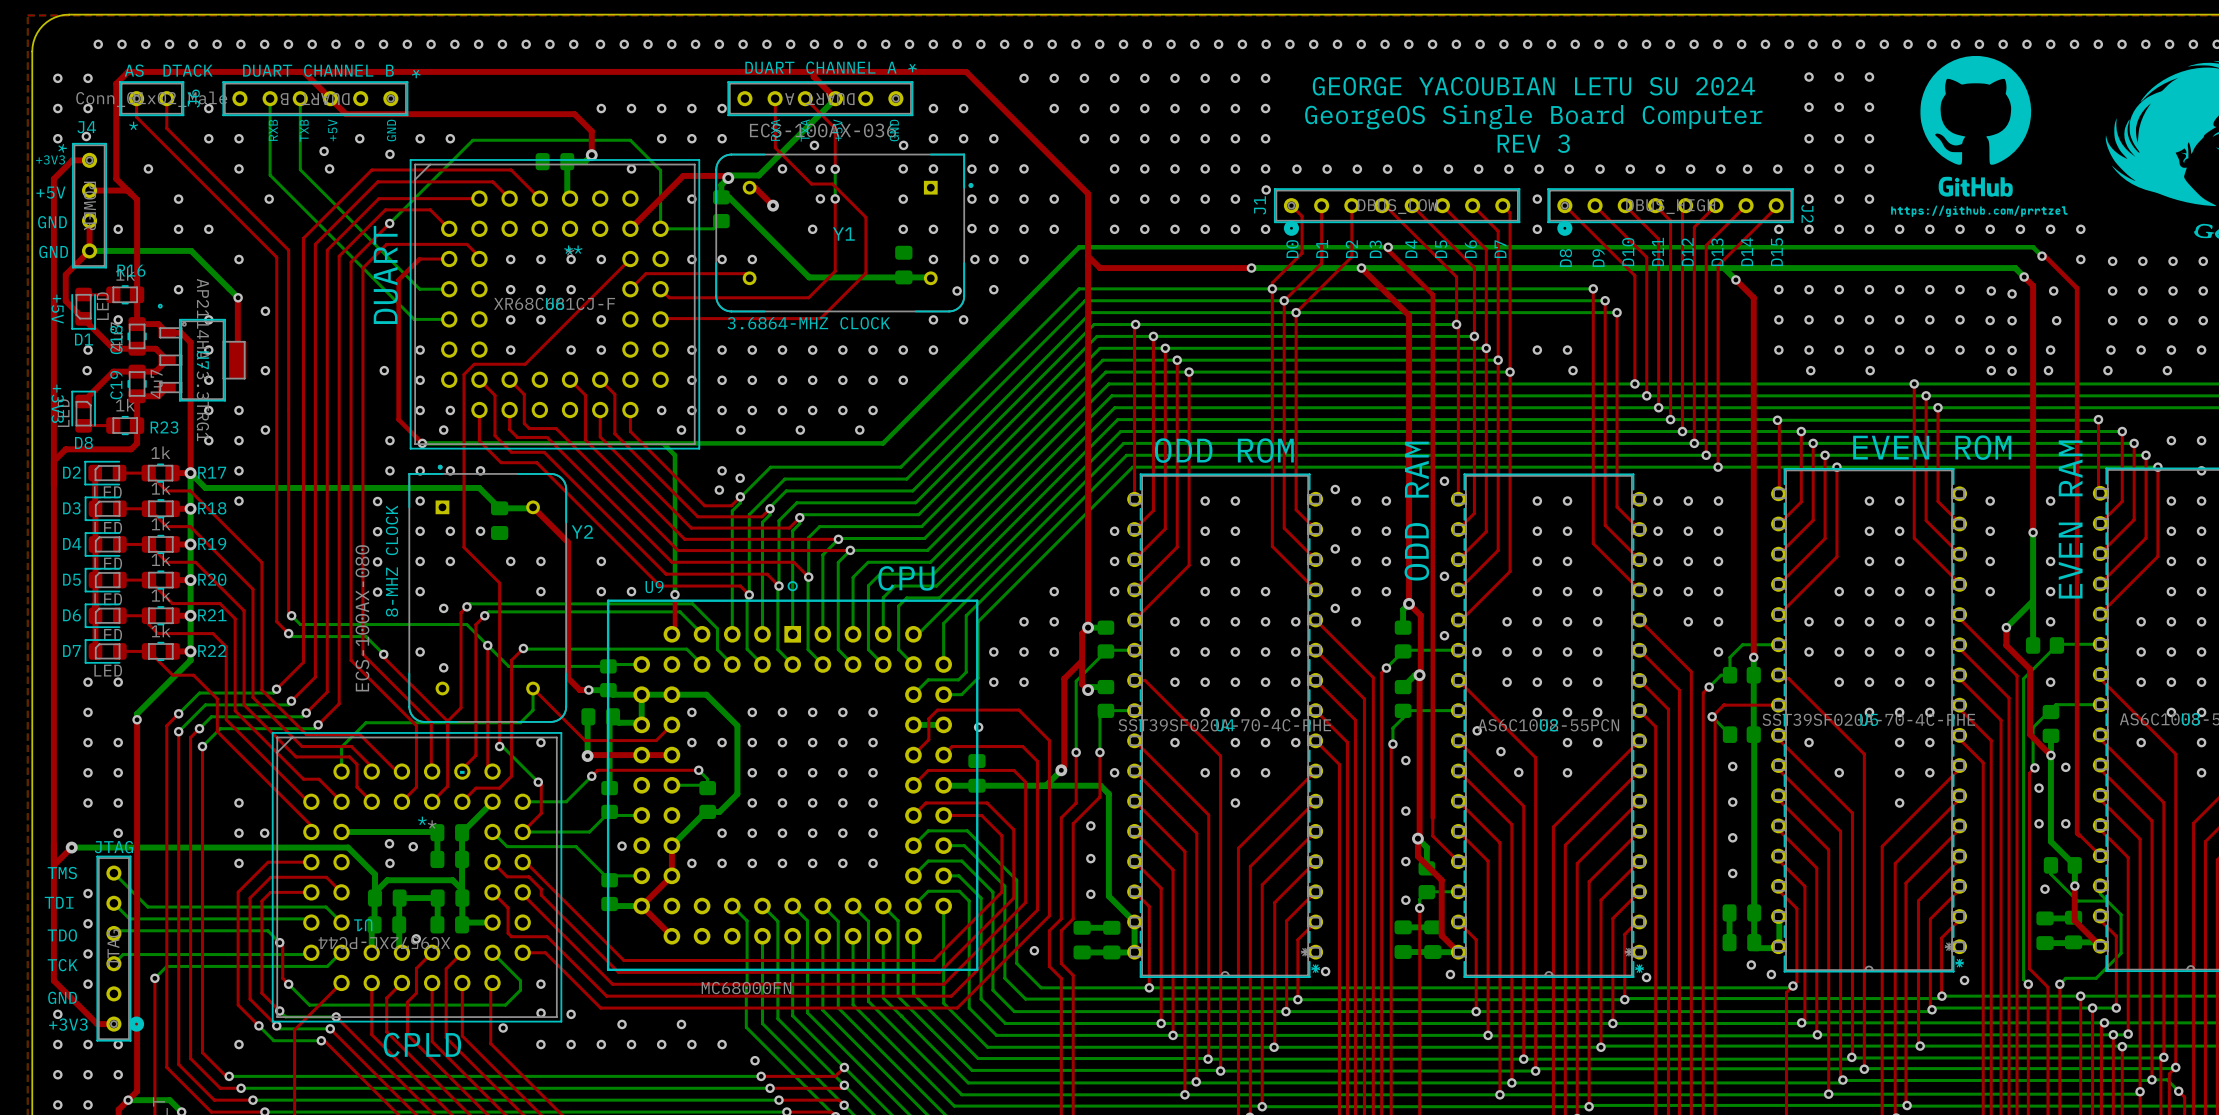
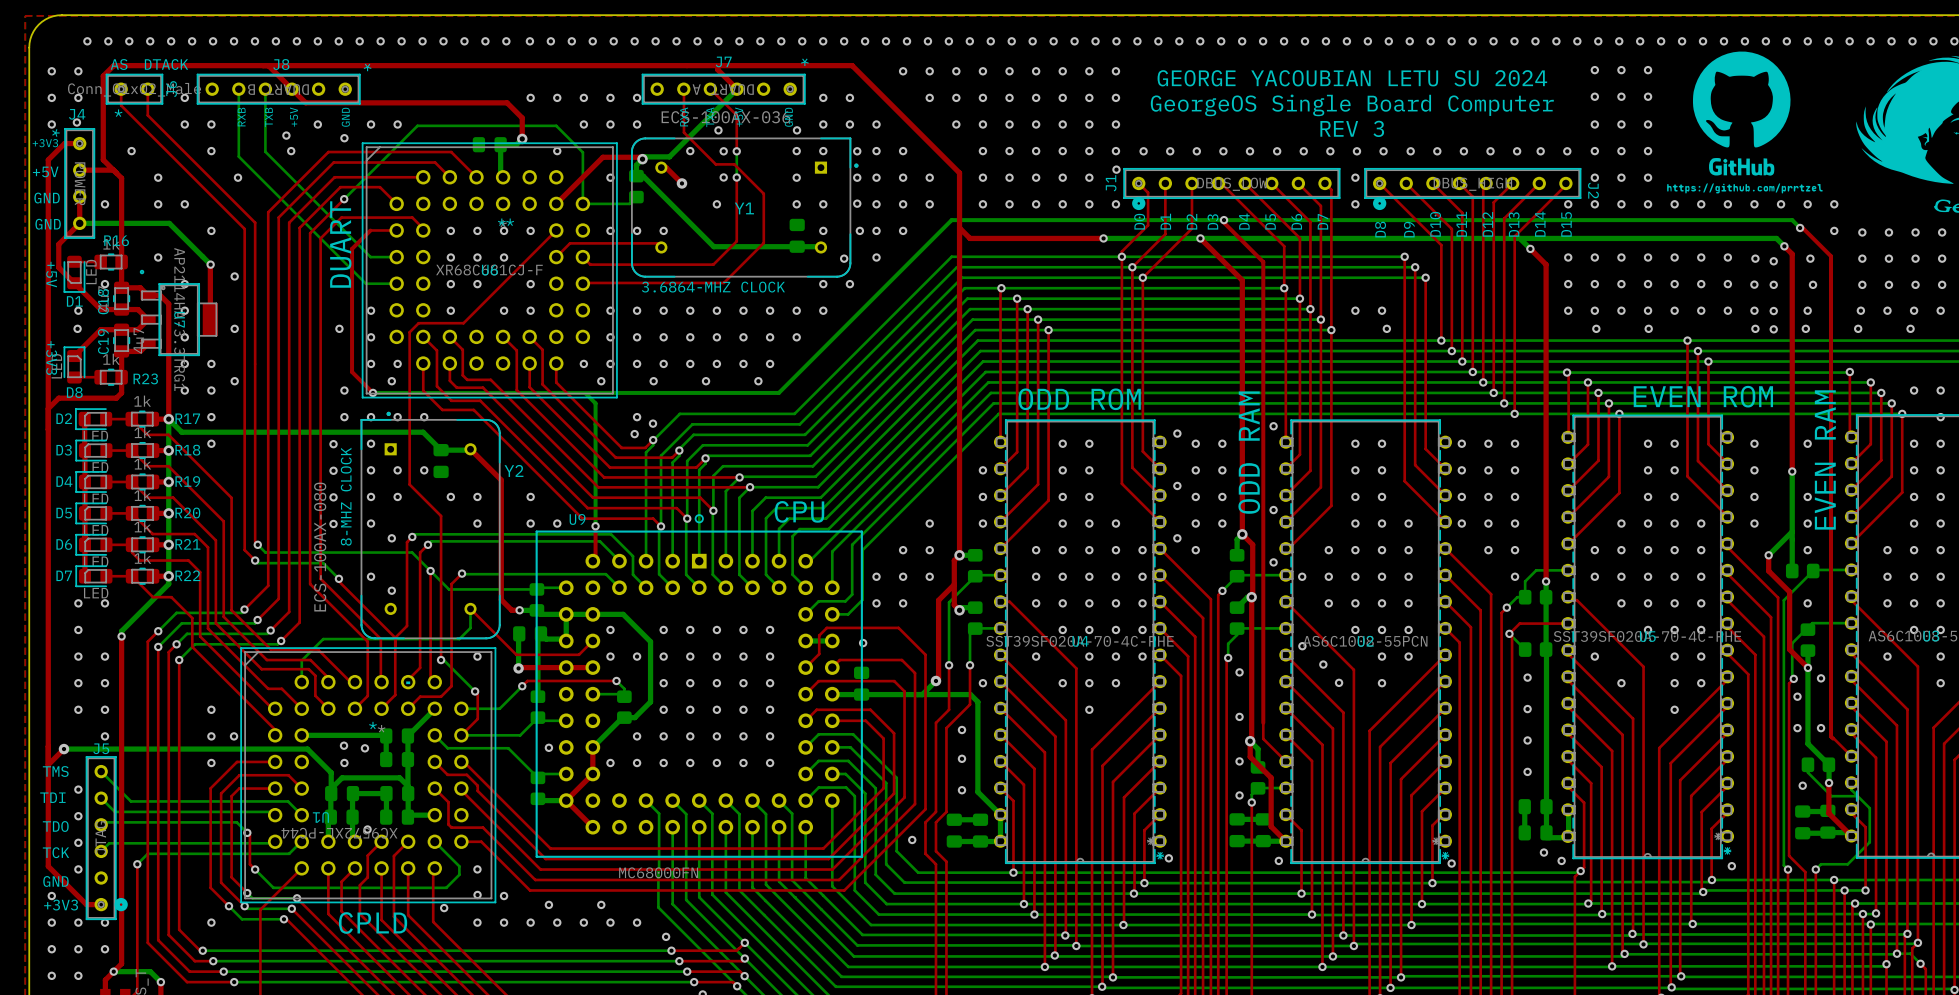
DUART CHANNEL A name: DUART CHANNEL A (820, 67) -> J7 (723, 61)
DUART CHANNEL B name: DUART CHANNEL B (318, 70) -> J8 (281, 64)
JTAG name: JTAG (113, 847) -> J5 (101, 748)

